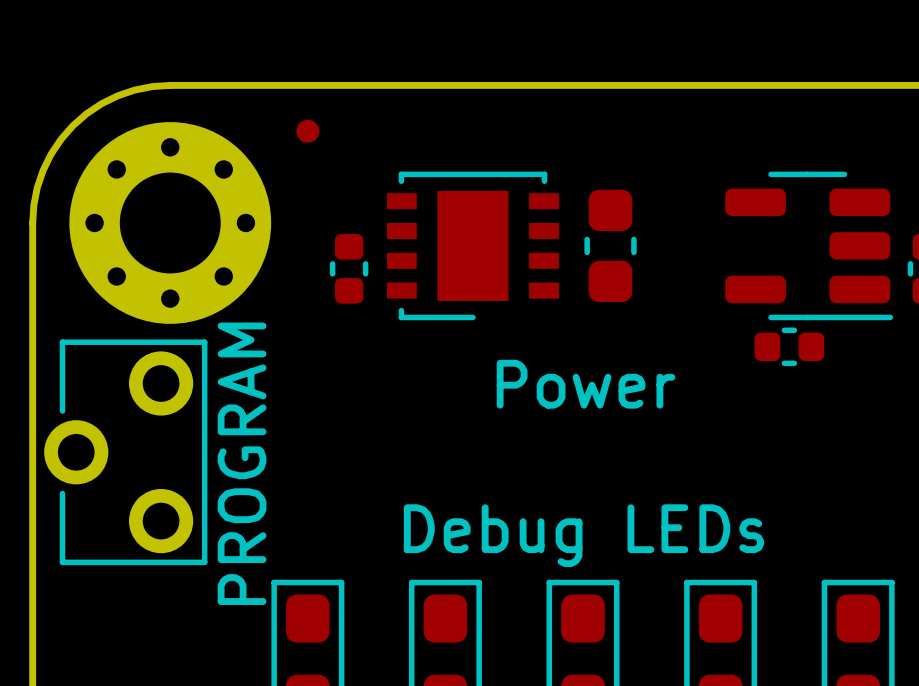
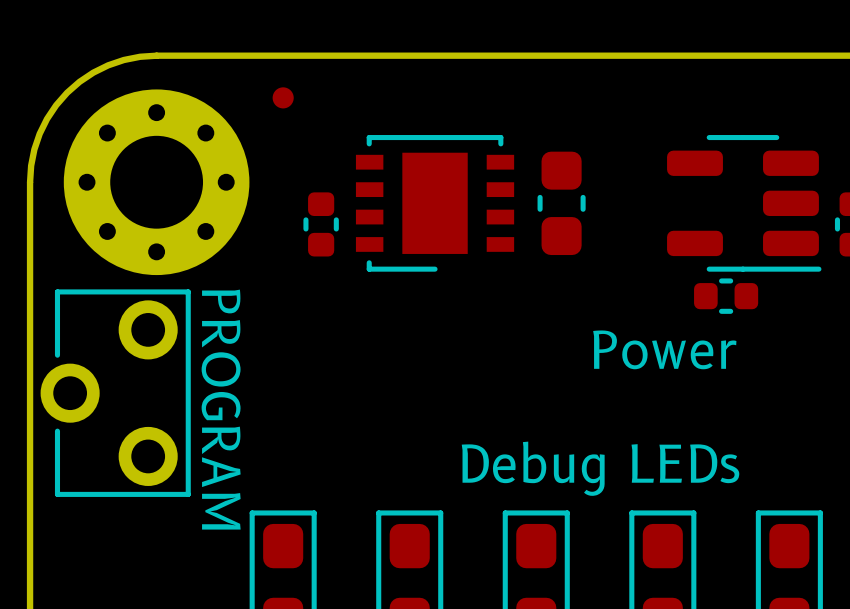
text position: Power (586, 384) -> Power (664, 349)
text rotation: 0° (242, 463) -> 180° (221, 409)
text position: Debug LEDs (584, 535) -> Debug LEDs (600, 468)

